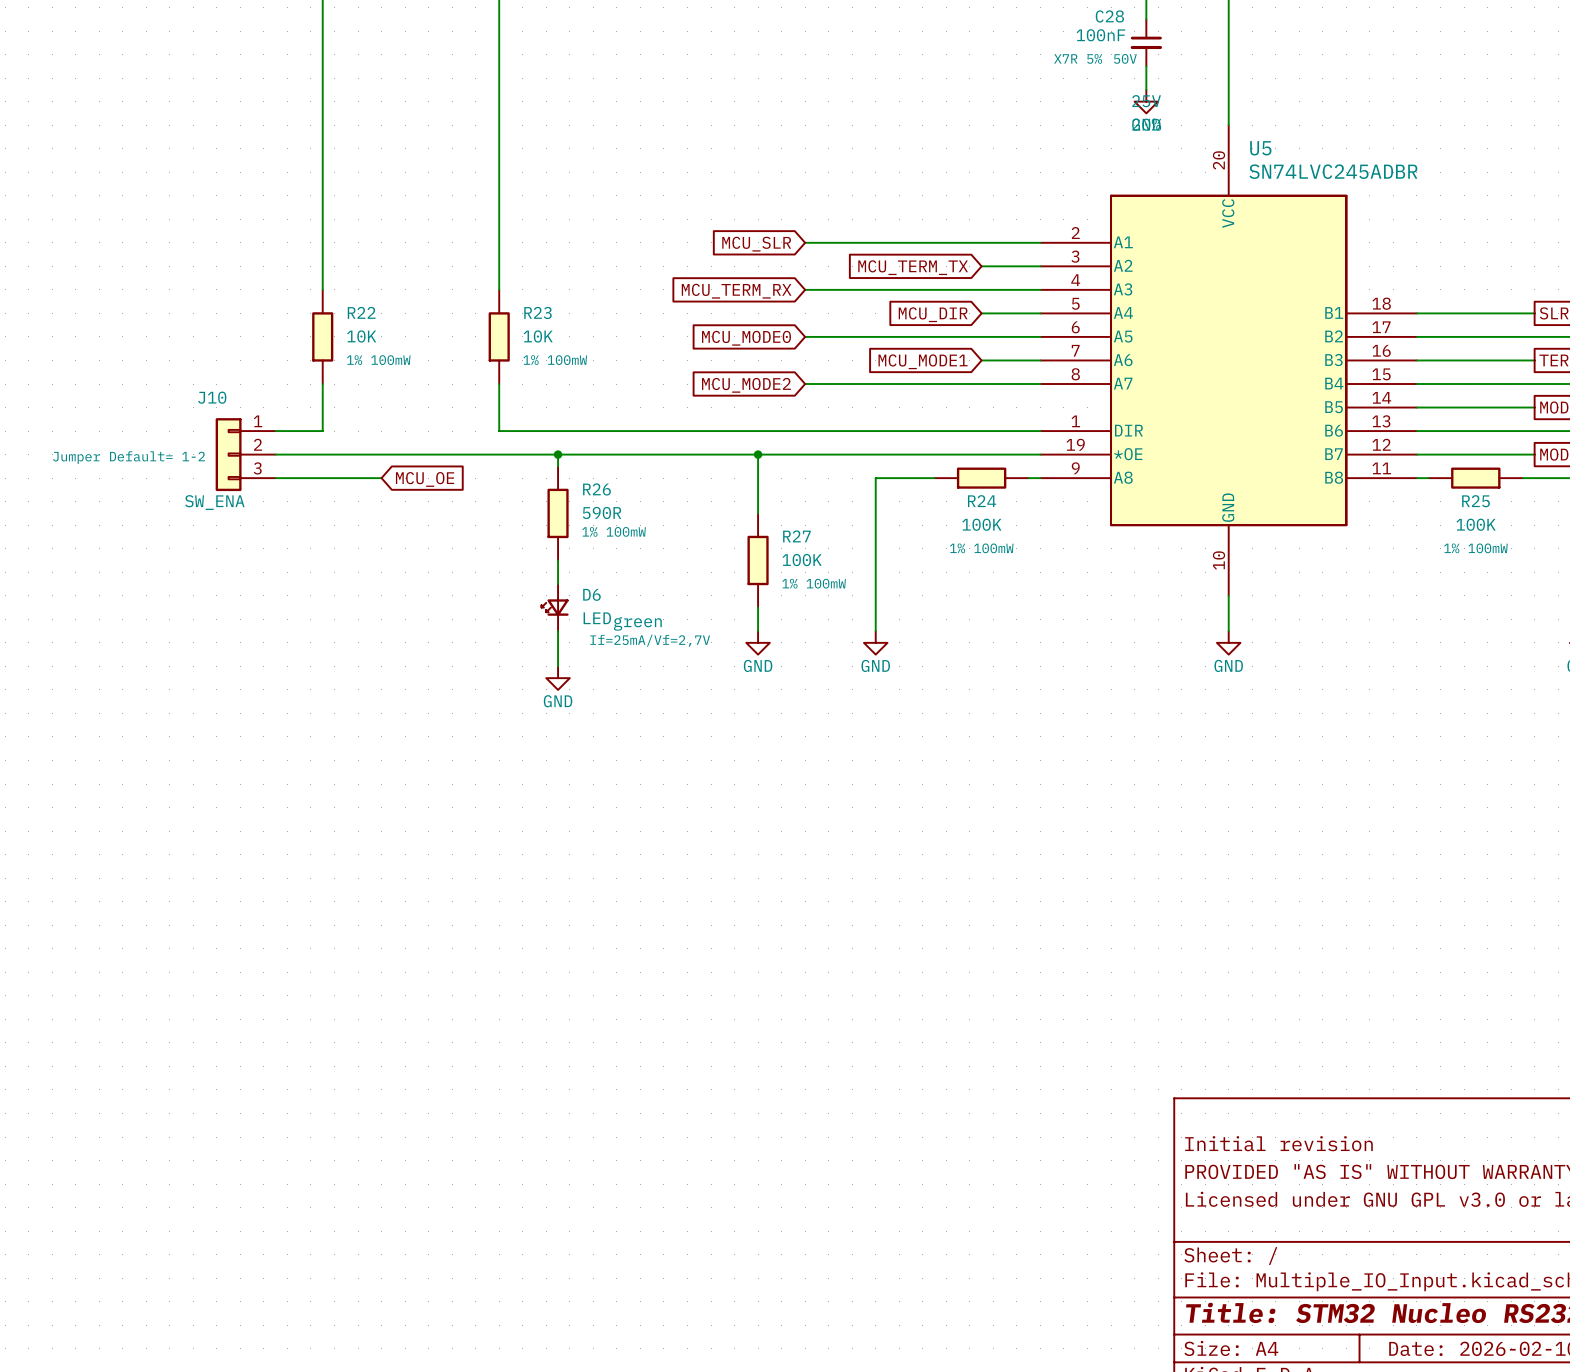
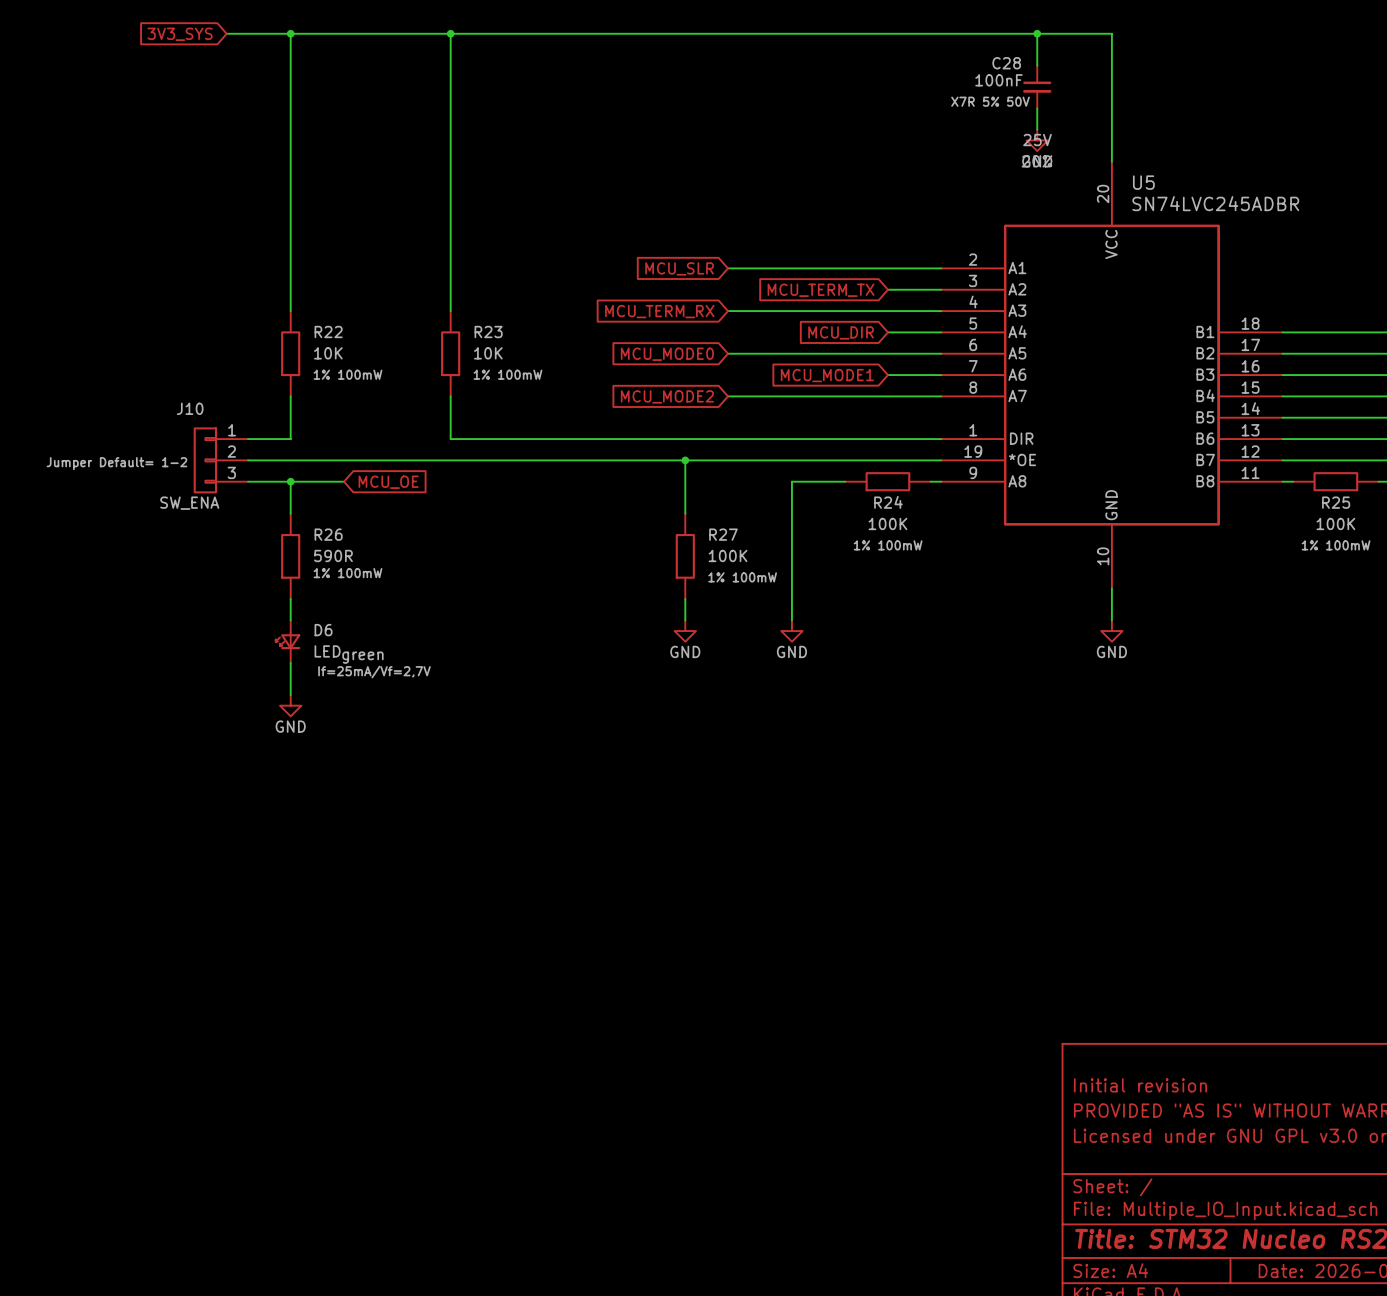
wire: (558, 454) (558, 466) -> none
junction: (558, 454) -> none
wire: none -> (290, 481) (290, 513)
junction: none -> (290, 481)
R26 position: (558, 513) -> (290, 556)
wire: (558, 560) (558, 584) -> none
wire: none -> (290, 599) (290, 620)
D6 position: (555, 607) -> (288, 641)
wire: (558, 631) (558, 666) -> none
wire: none -> (290, 663) (290, 695)
power symbol: GND (558, 678) -> none
power symbol: none -> GND (290, 705)

